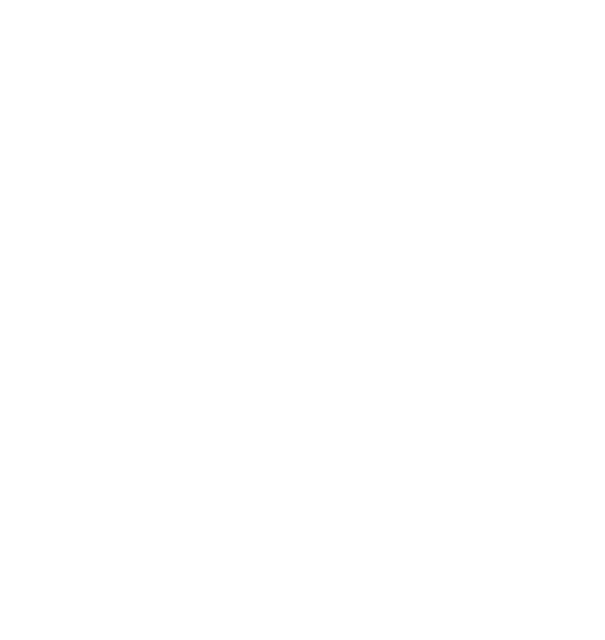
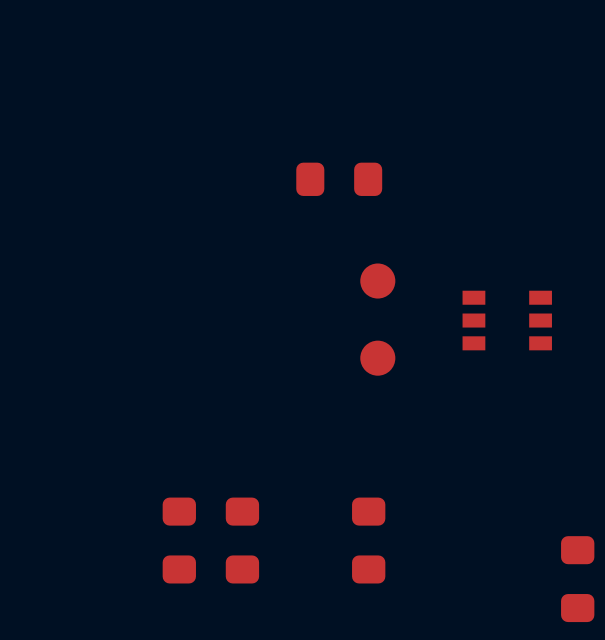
part: none -> (339, 179)
part: none -> (377, 281)
part: none -> (507, 320)
part: none -> (377, 358)
part: none -> (179, 540)
part: none -> (242, 540)
part: none -> (368, 540)
part: none -> (577, 579)

